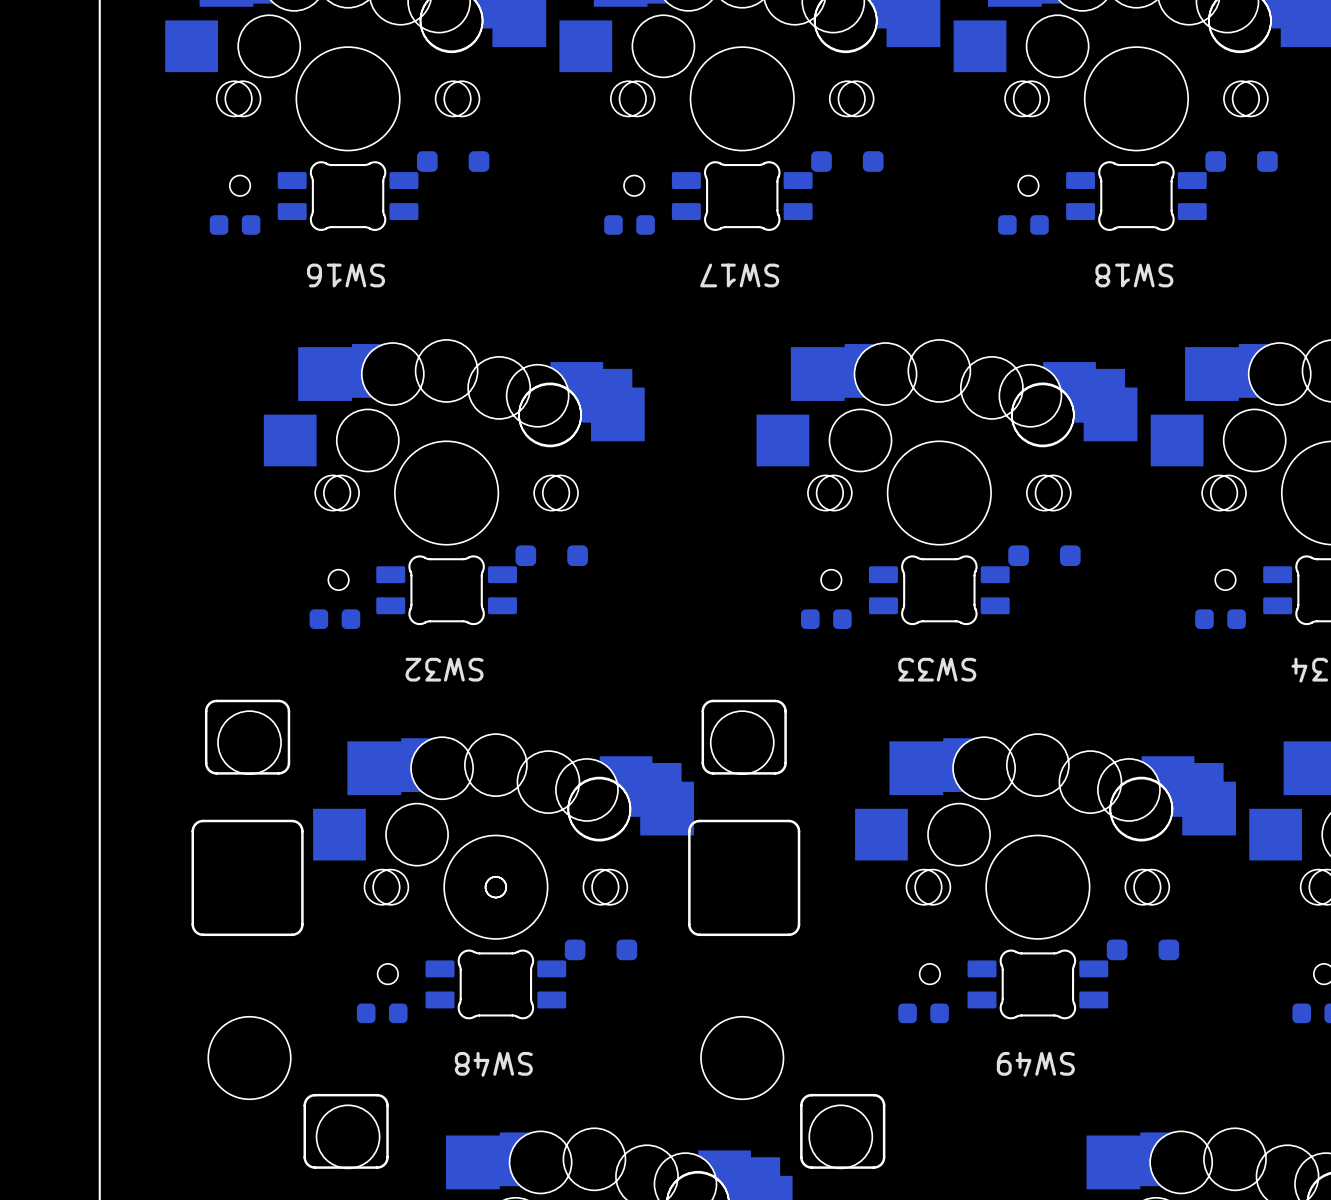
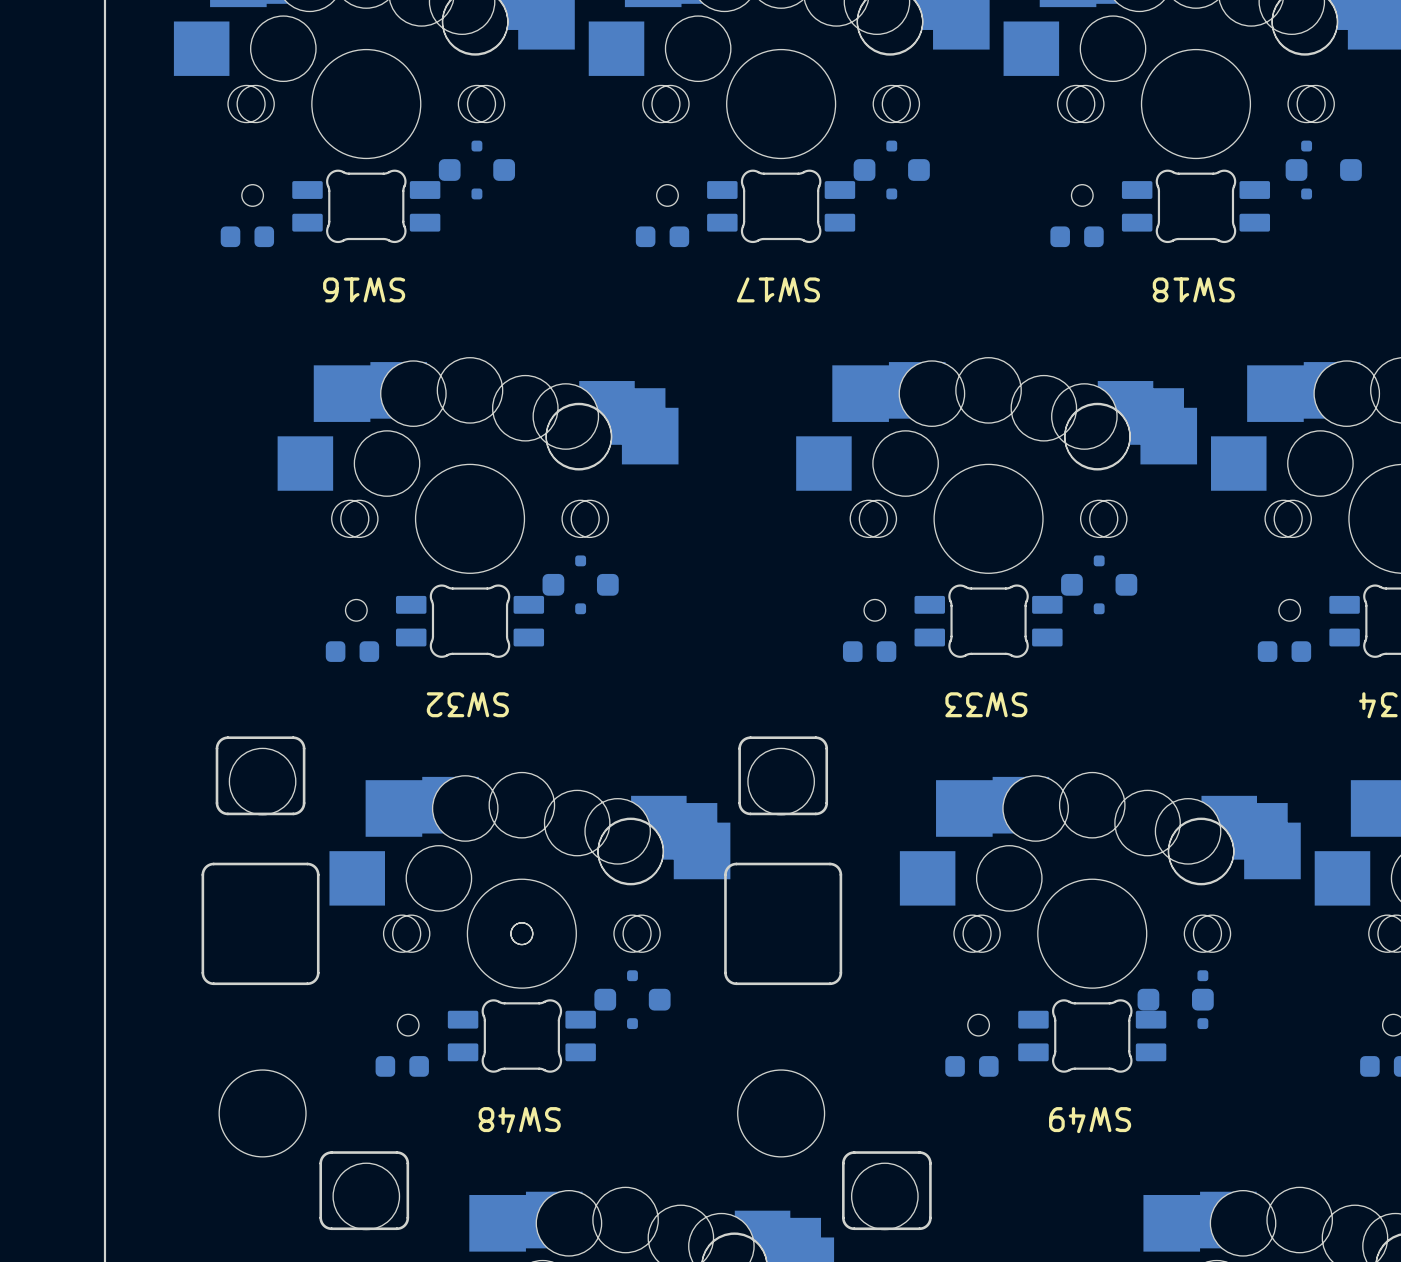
part footprint: [1205, 151, 1278, 172] -> [1301, 140, 1313, 200]
part: none -> (476, 170)
part: none -> (891, 170)
part: none -> (1323, 170)
part: none -> (580, 584)
part: none -> (1099, 584)
part footprint: [1106, 939, 1180, 961] -> [1197, 970, 1209, 1030]
part: none -> (632, 999)
part: none -> (1175, 999)

